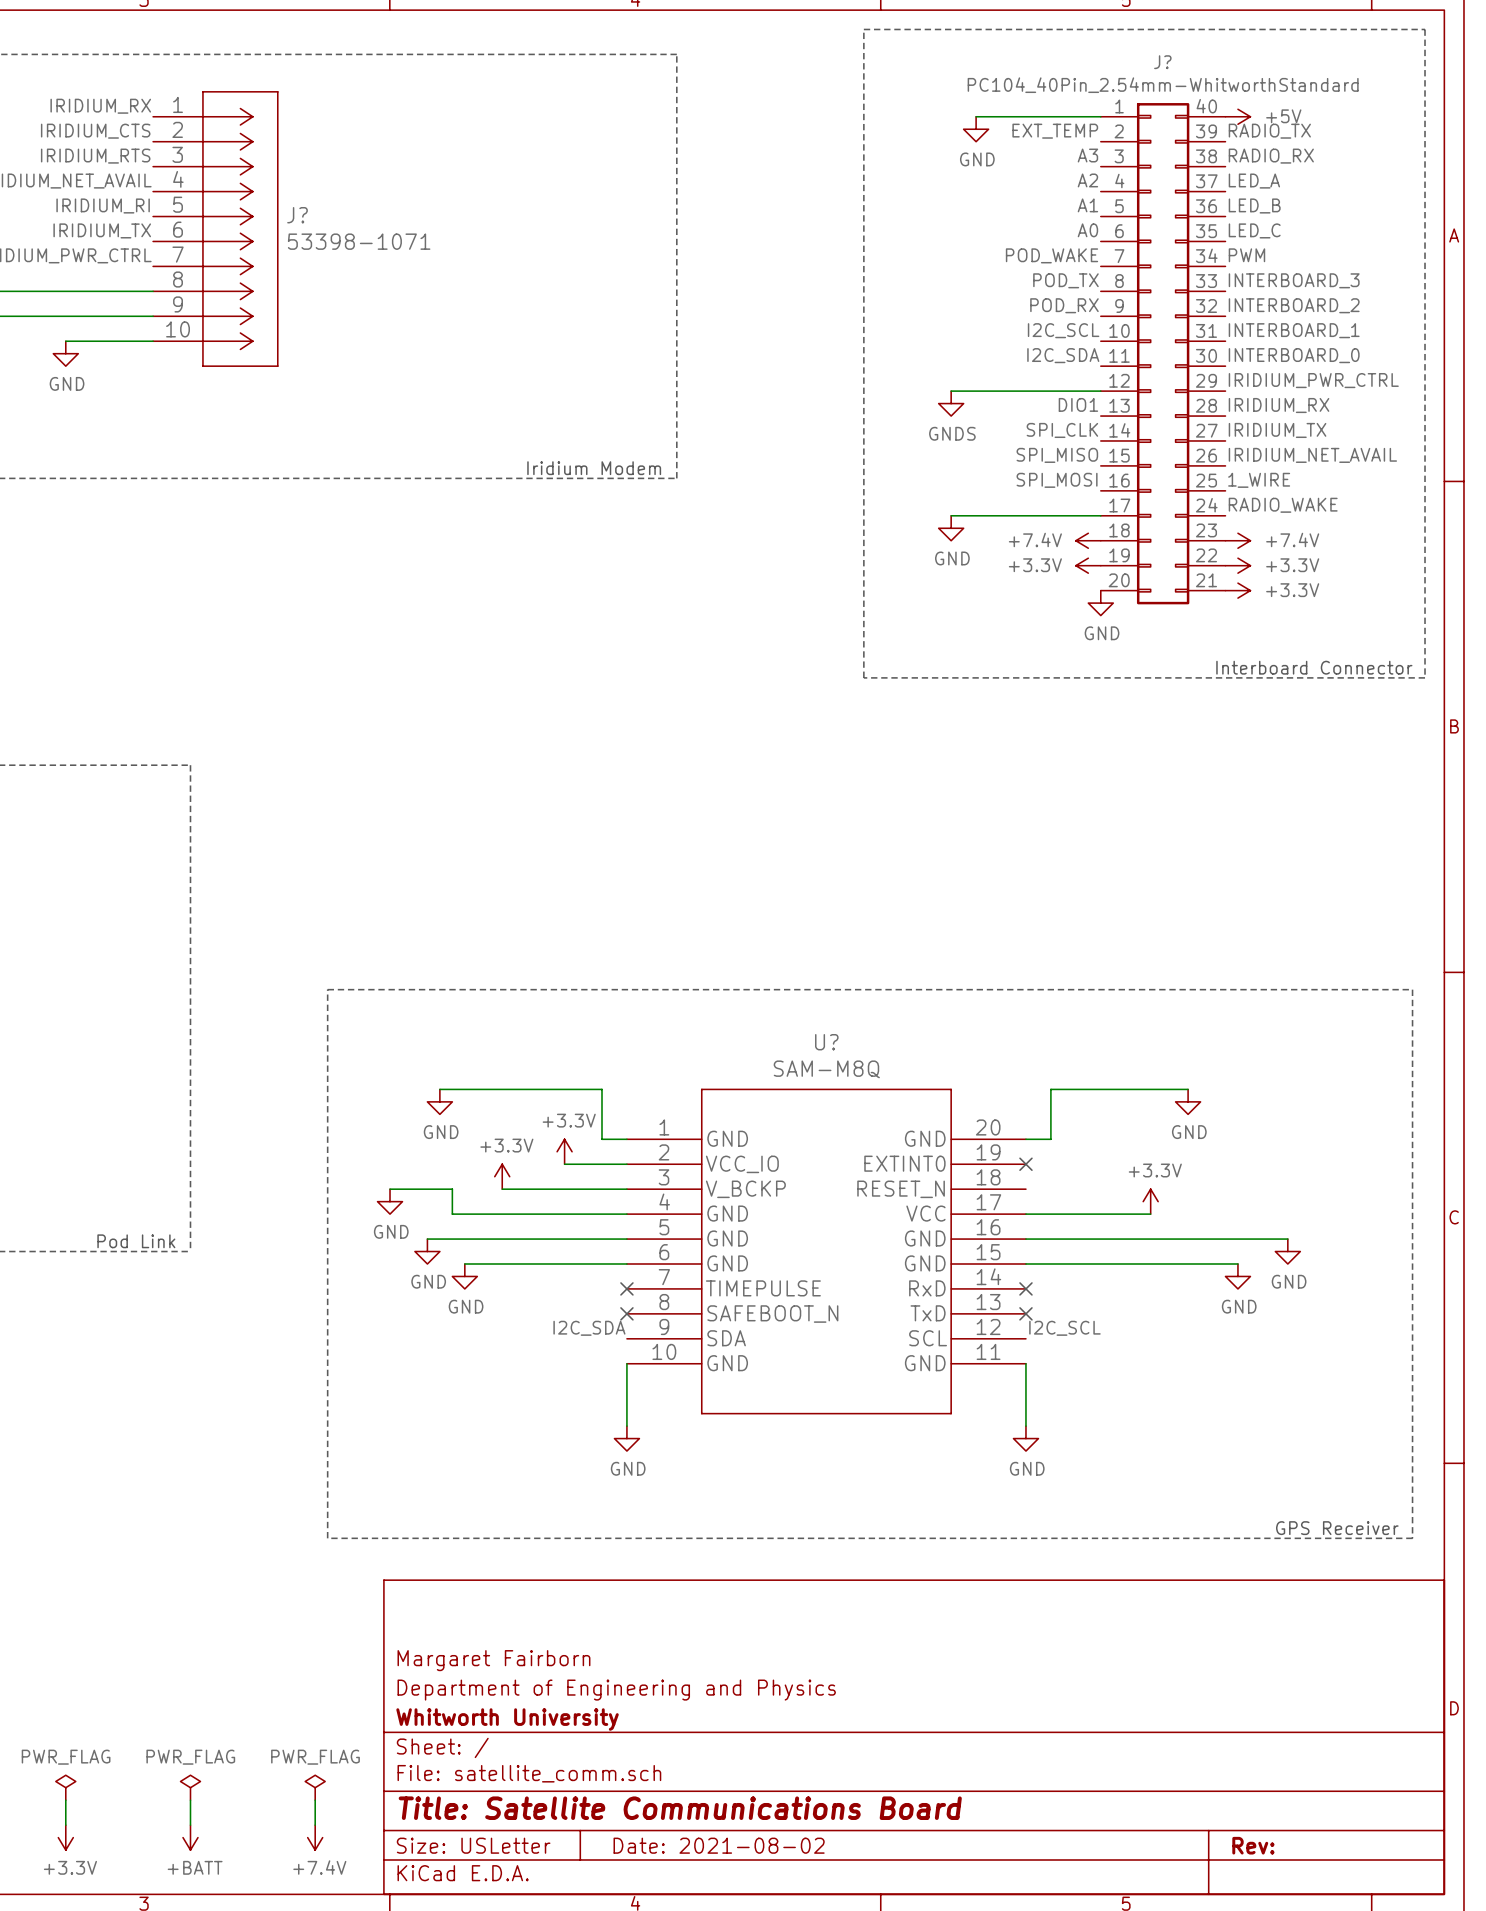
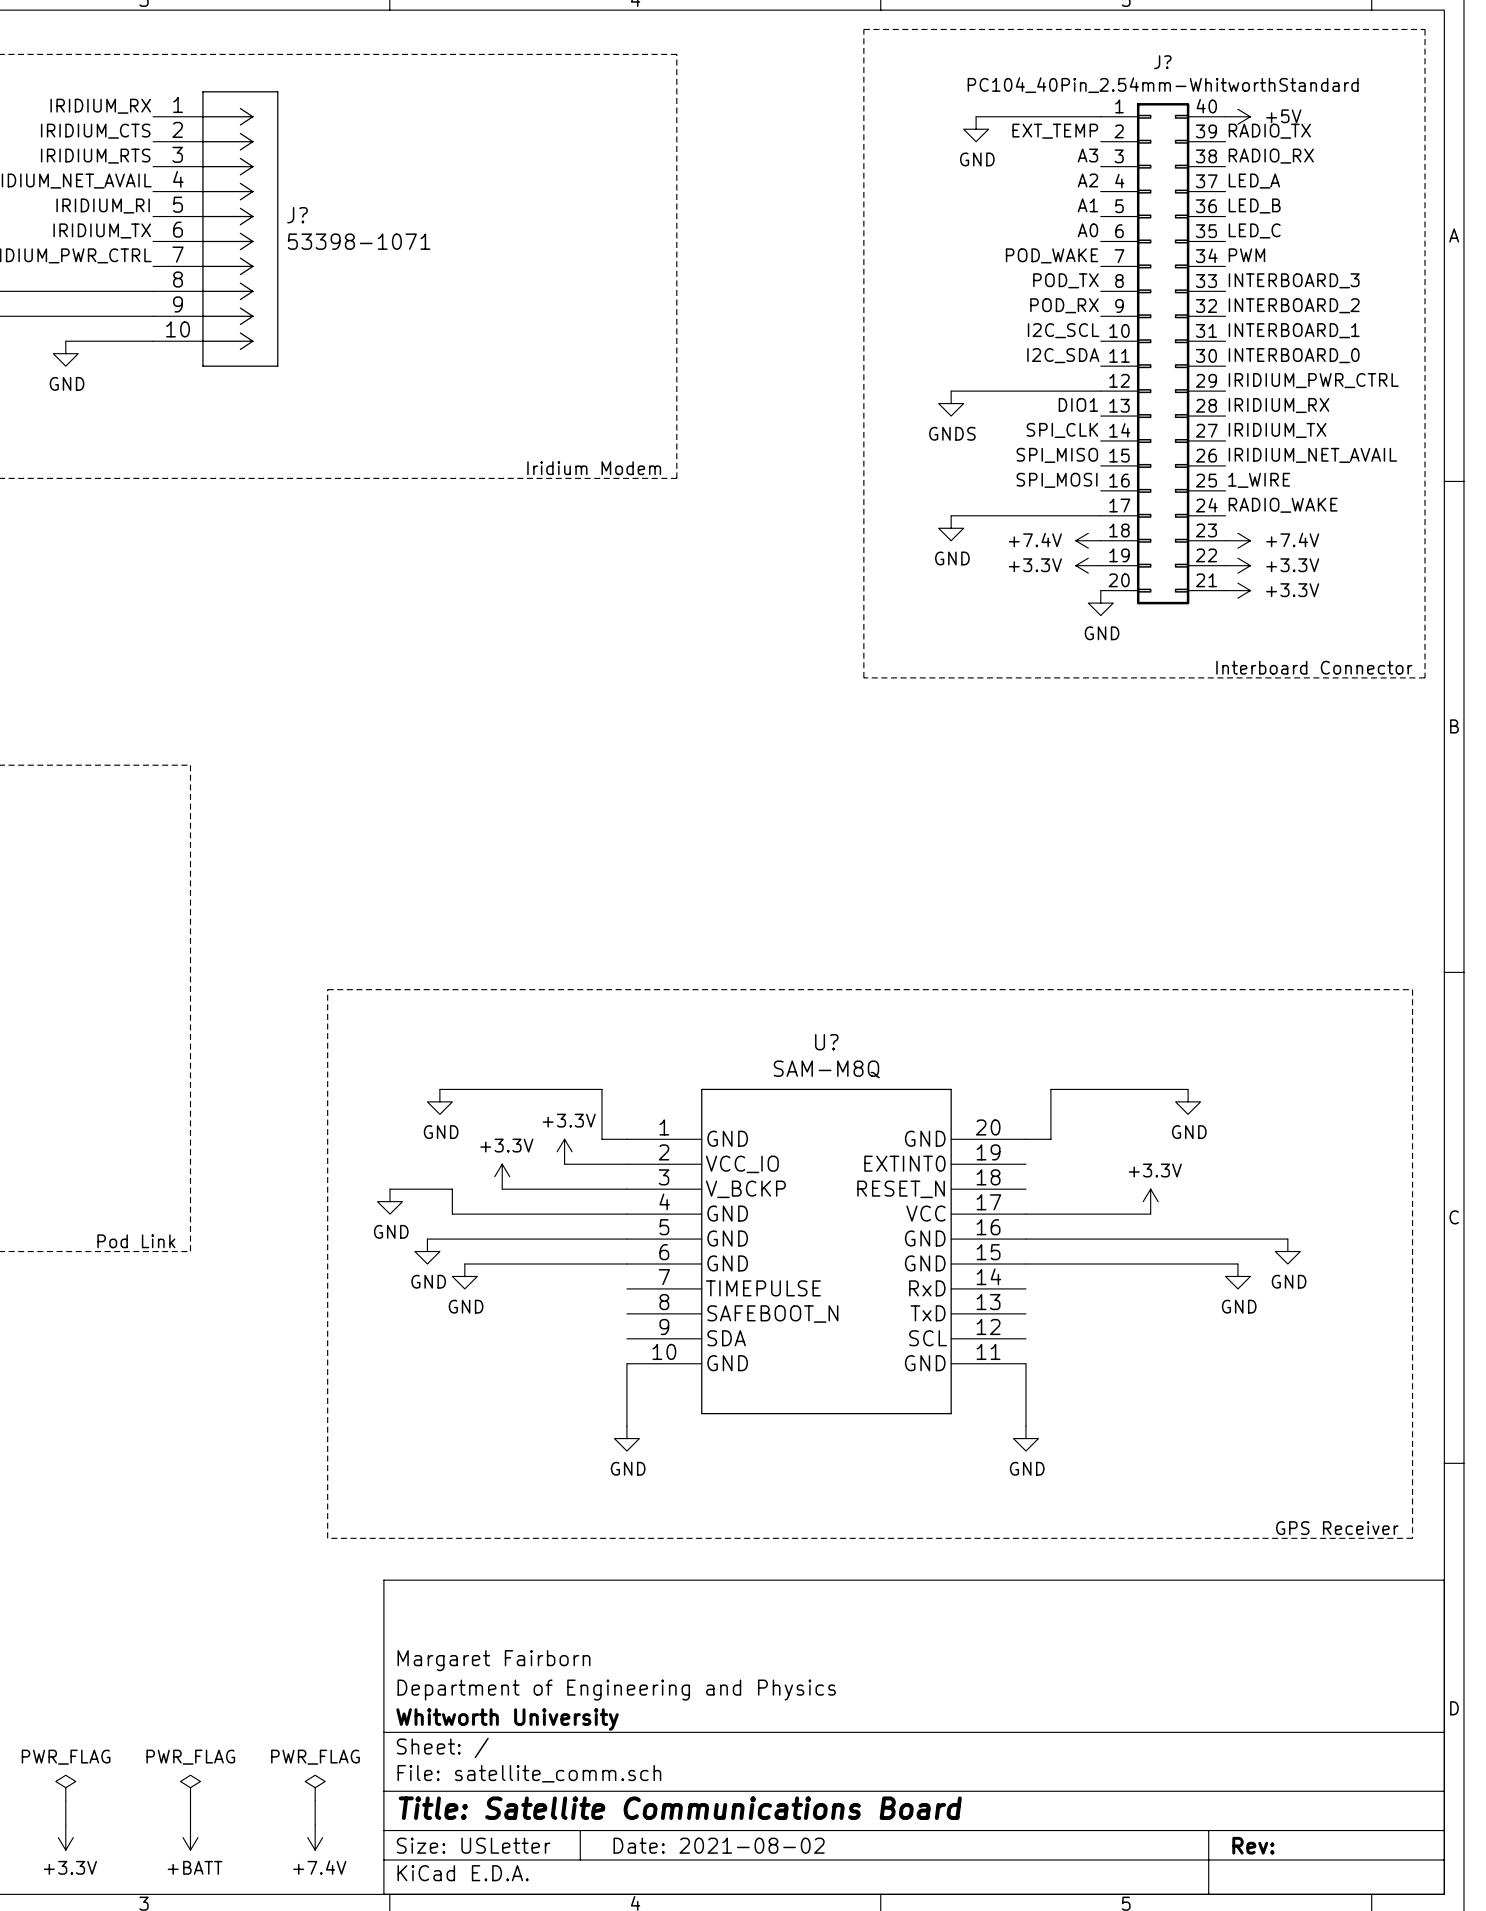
no-connect mark: (1025, 1164) -> none
no-connect mark: (626, 1288) -> none
no-connect mark: (1025, 1288) -> none
no-connect mark: (626, 1313) -> none
no-connect mark: (1025, 1313) -> none
label: I2C_SDA (589, 1328) -> none
label: I2C_SCL (1064, 1328) -> none

